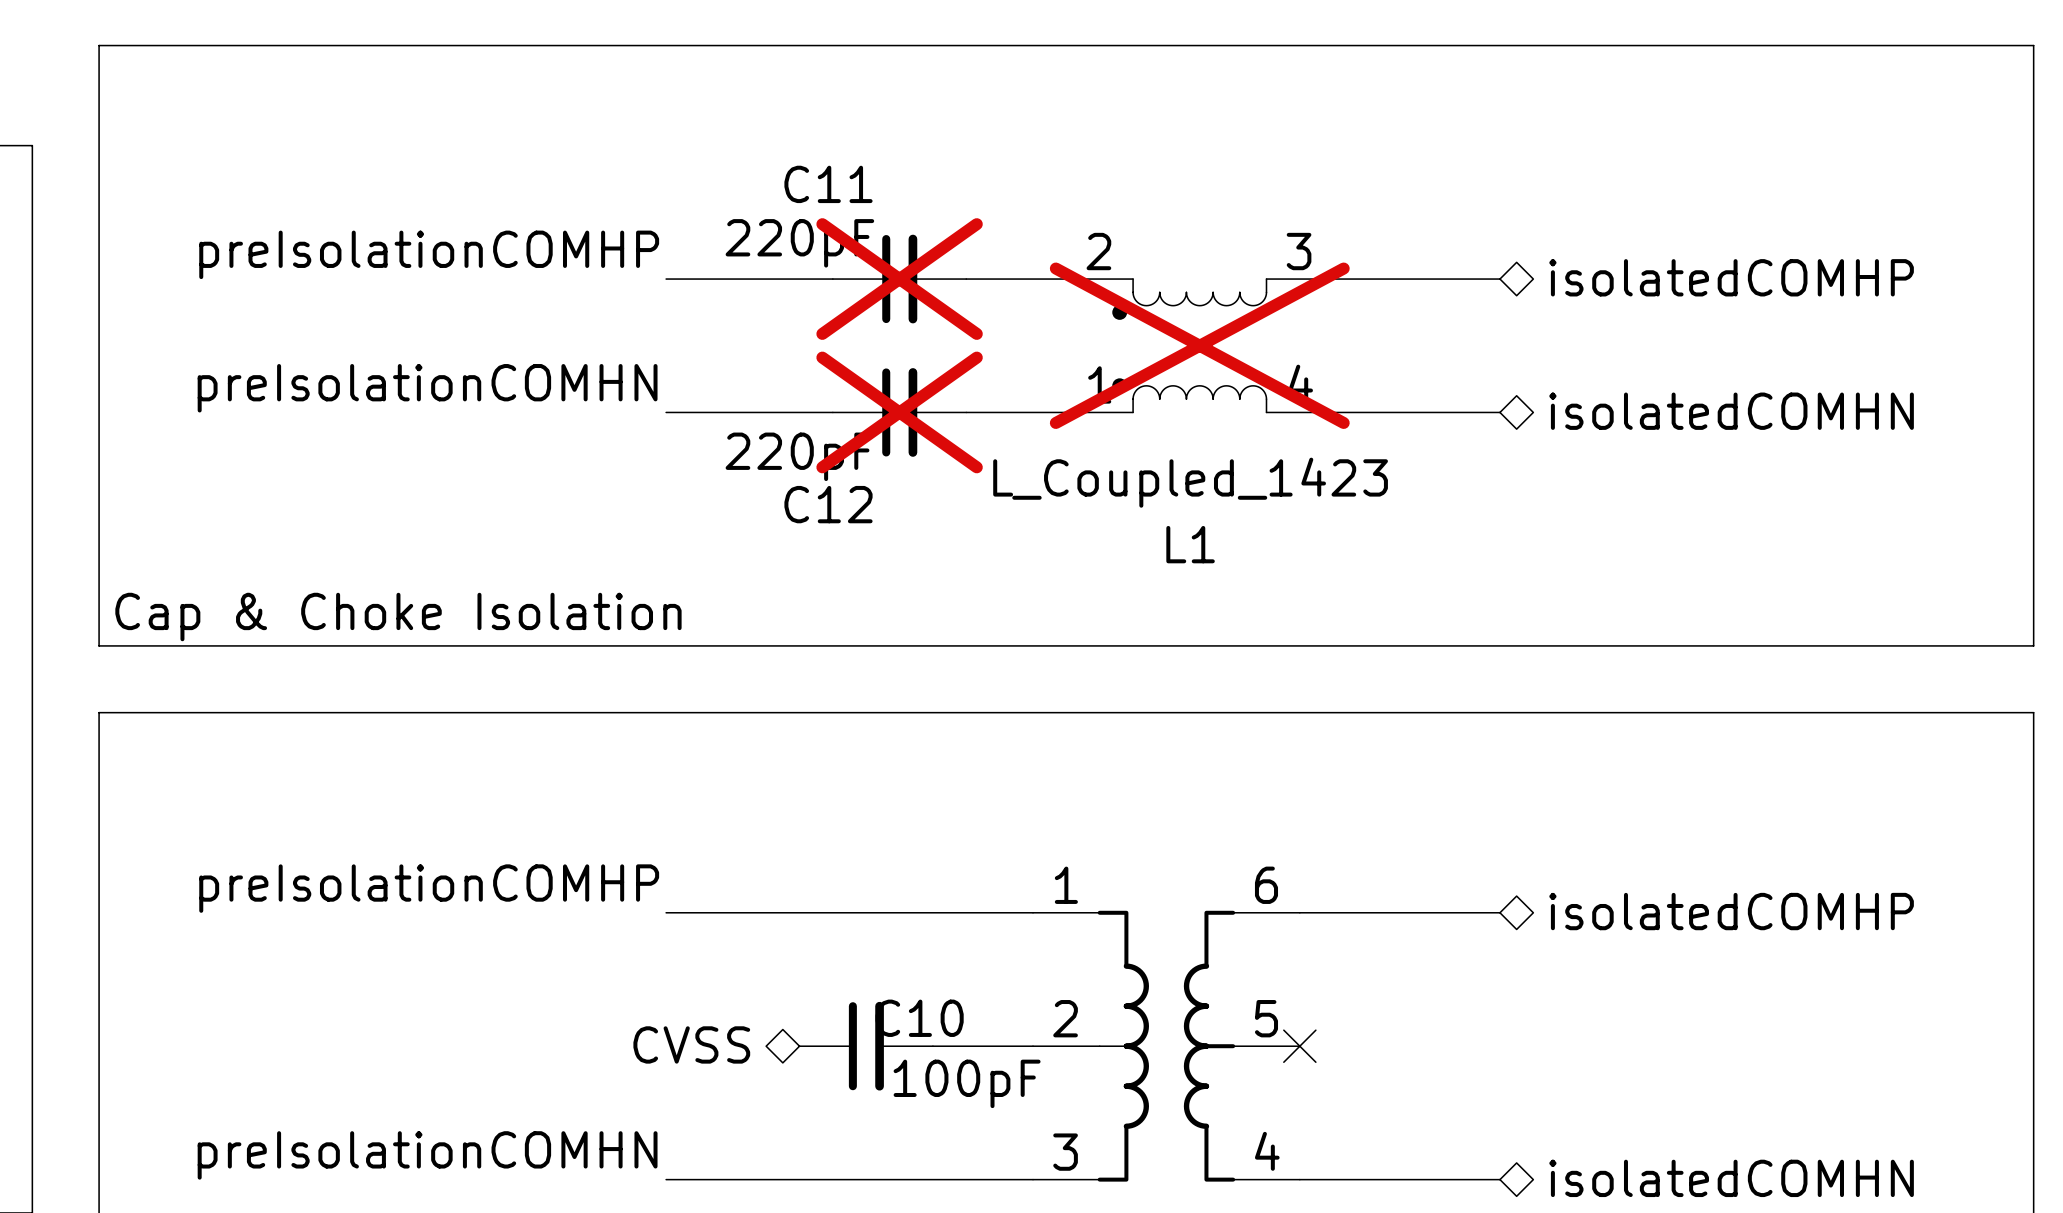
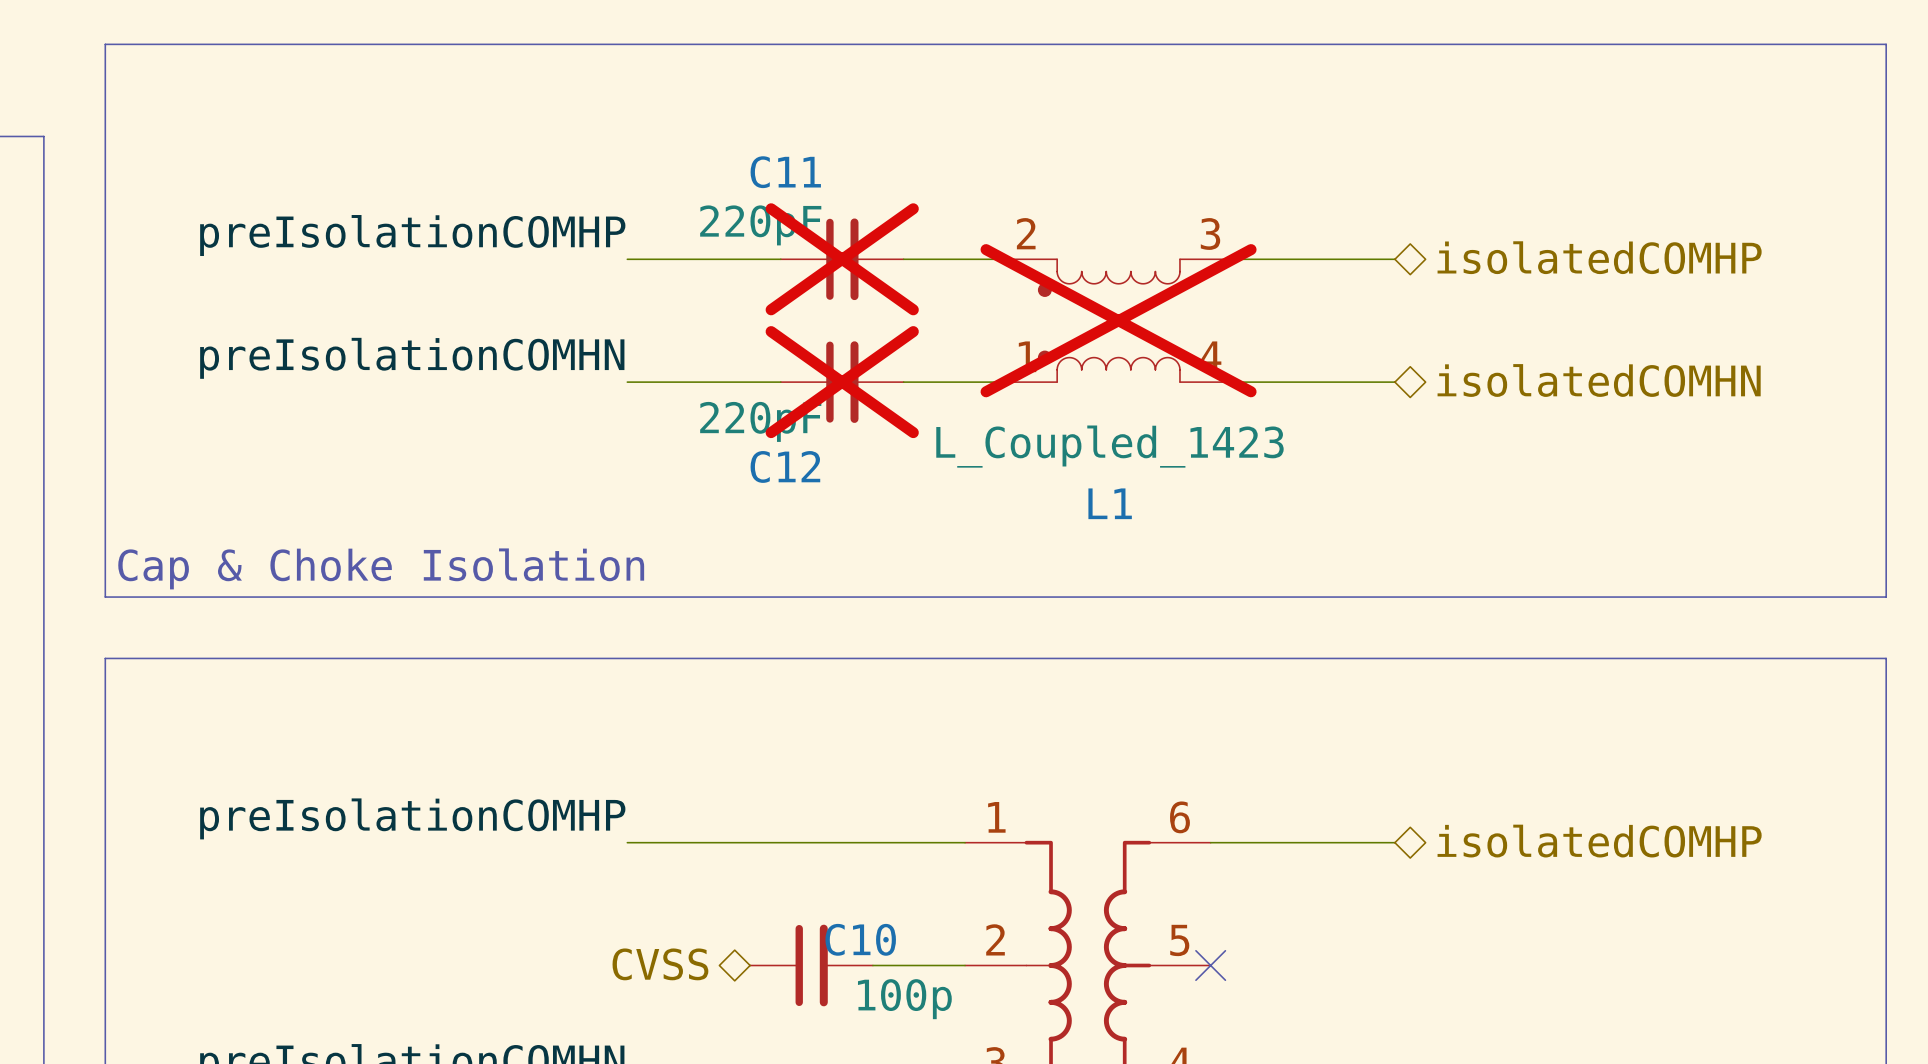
C10 value: 100pF (967, 1083) -> 100p (904, 999)

